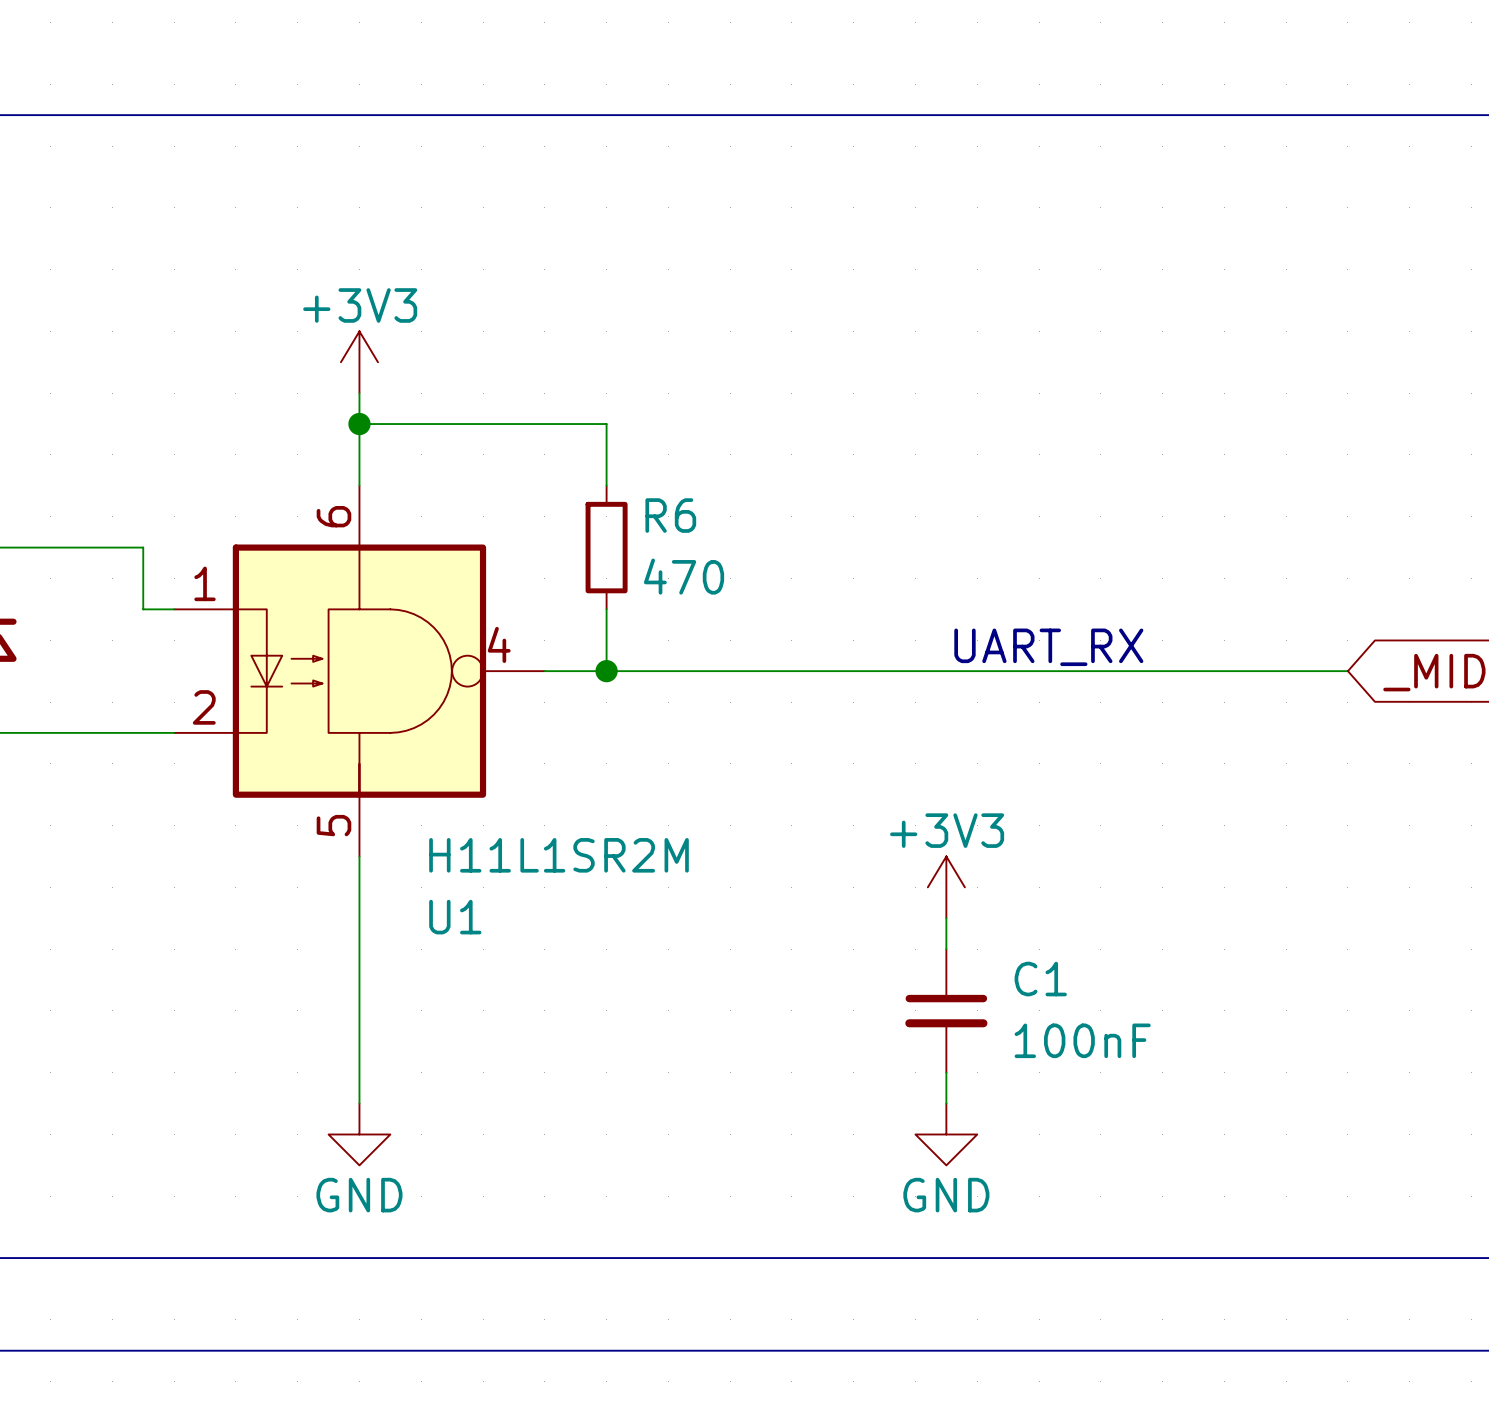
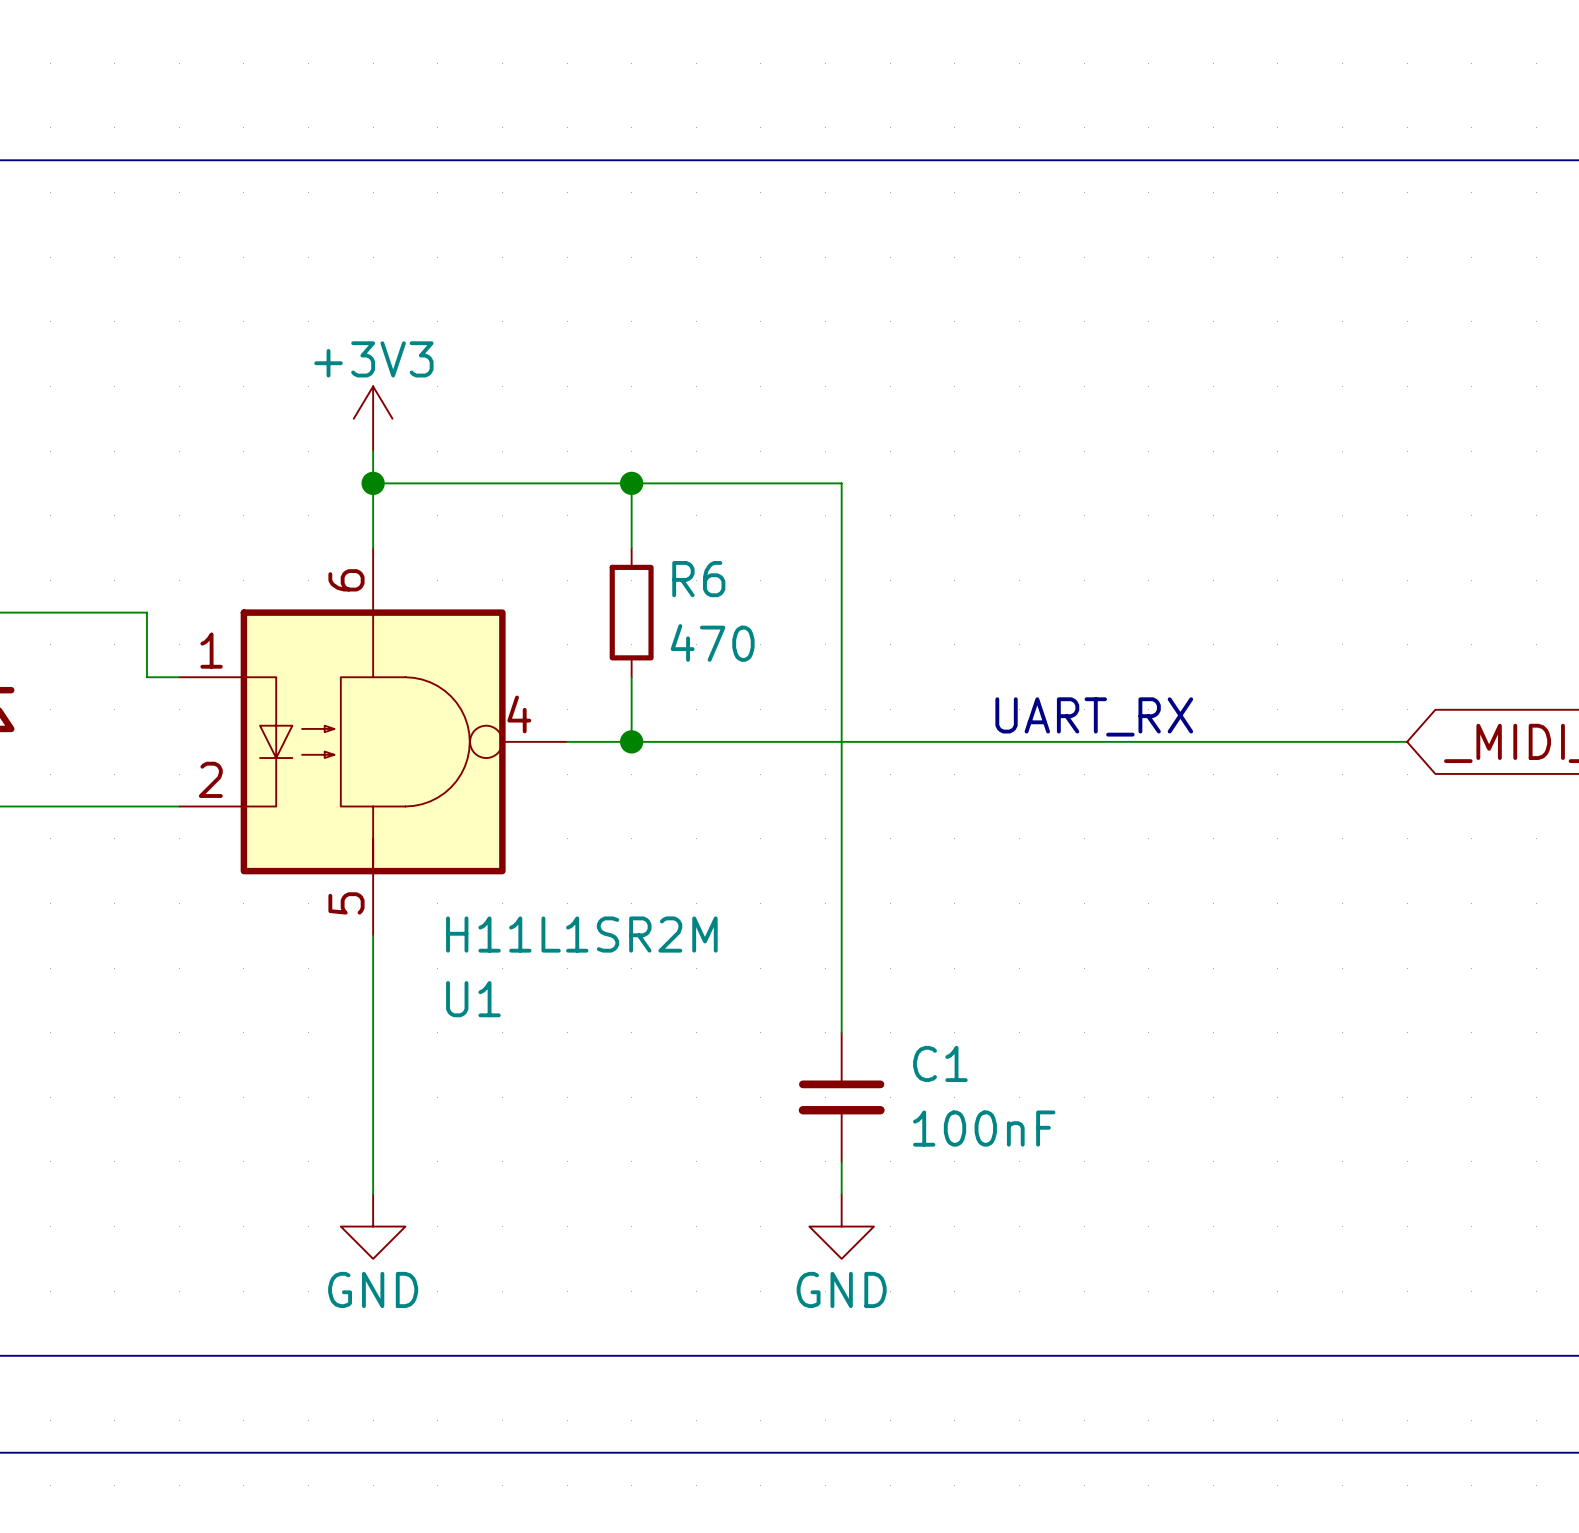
wire: none -> (631, 483) (841, 483) (841, 1032)
junction: none -> (631, 483)
power symbol: +3V3 (946, 887) -> none
wire: (946, 918) (946, 949) -> none
C1 position: (946, 1010) -> (841, 1097)
wire: (946, 1072) (946, 1103) -> (841, 1161) (841, 1194)
power symbol position: GND (946, 1134) -> GND (841, 1226)

